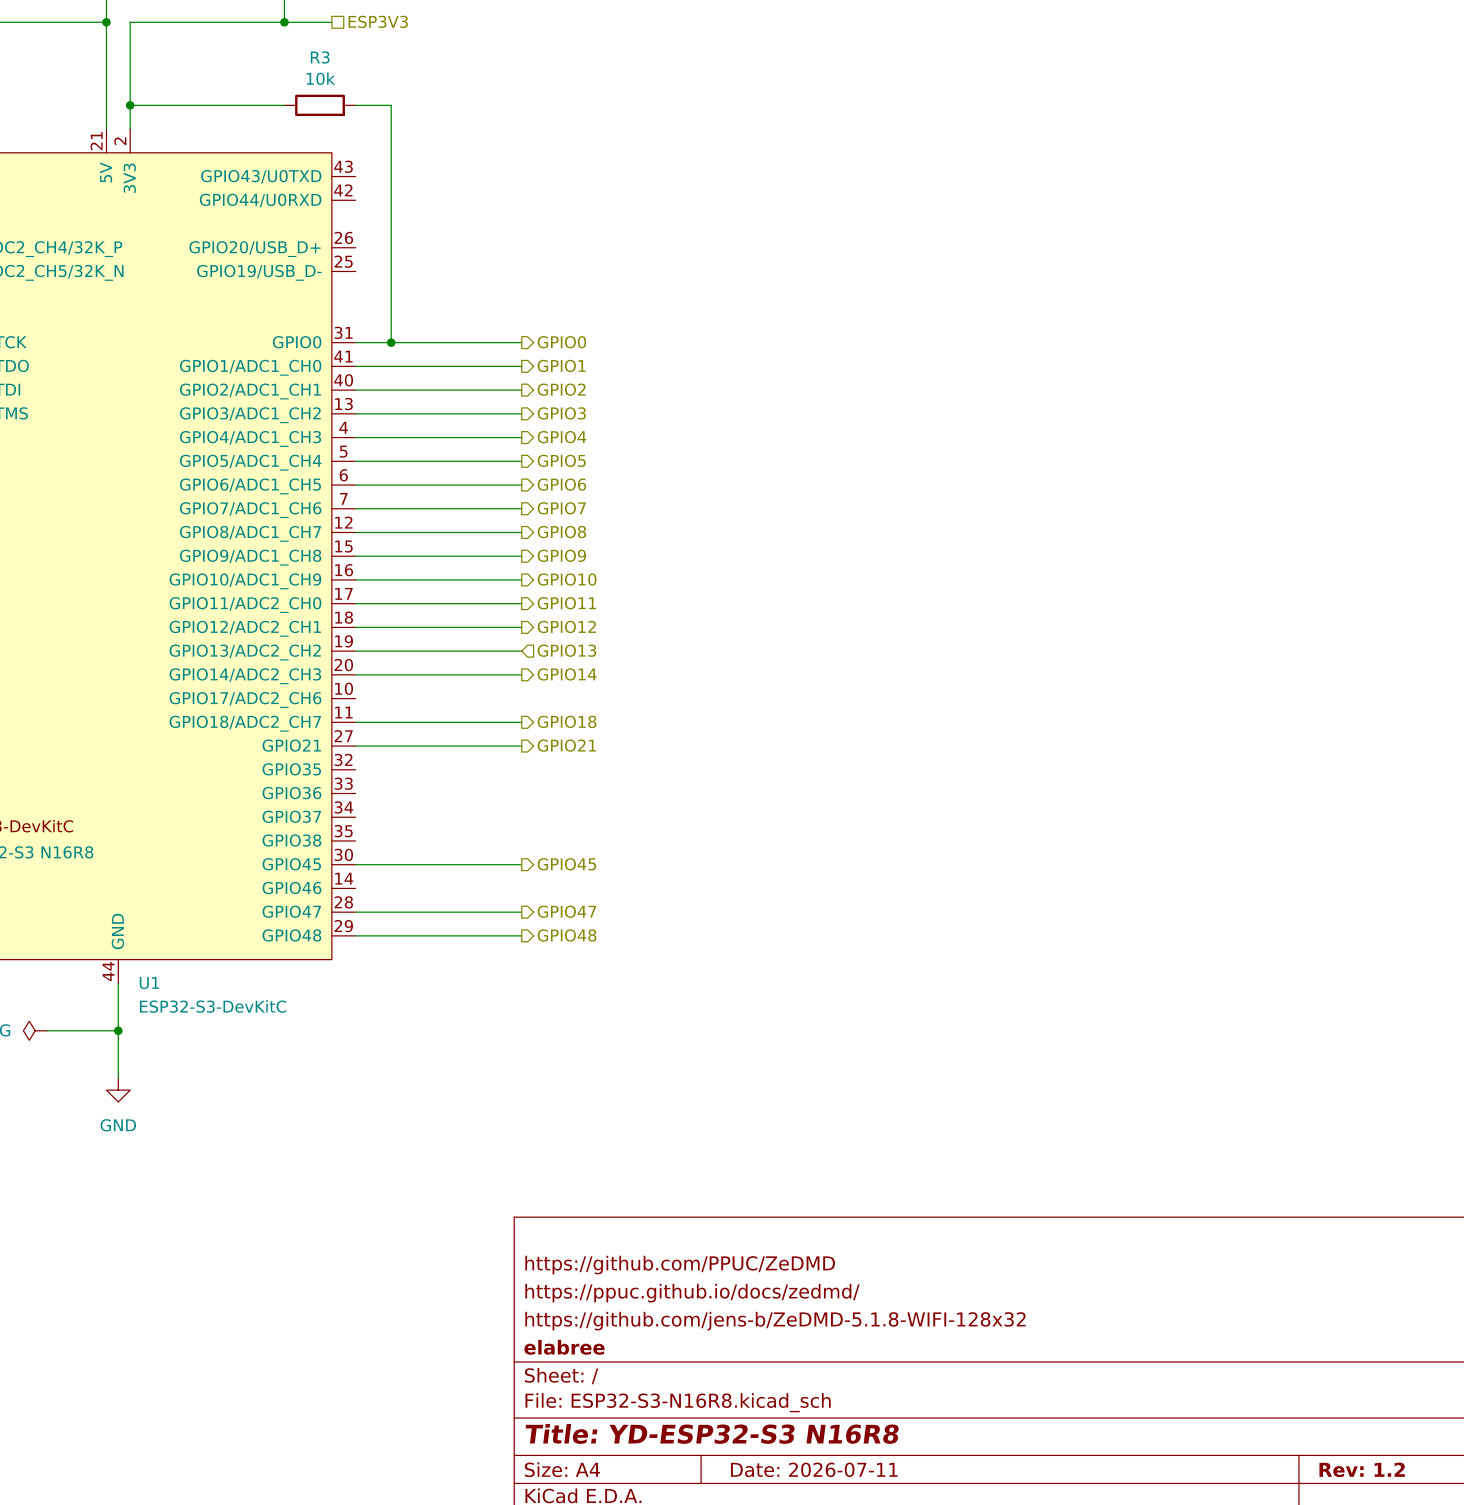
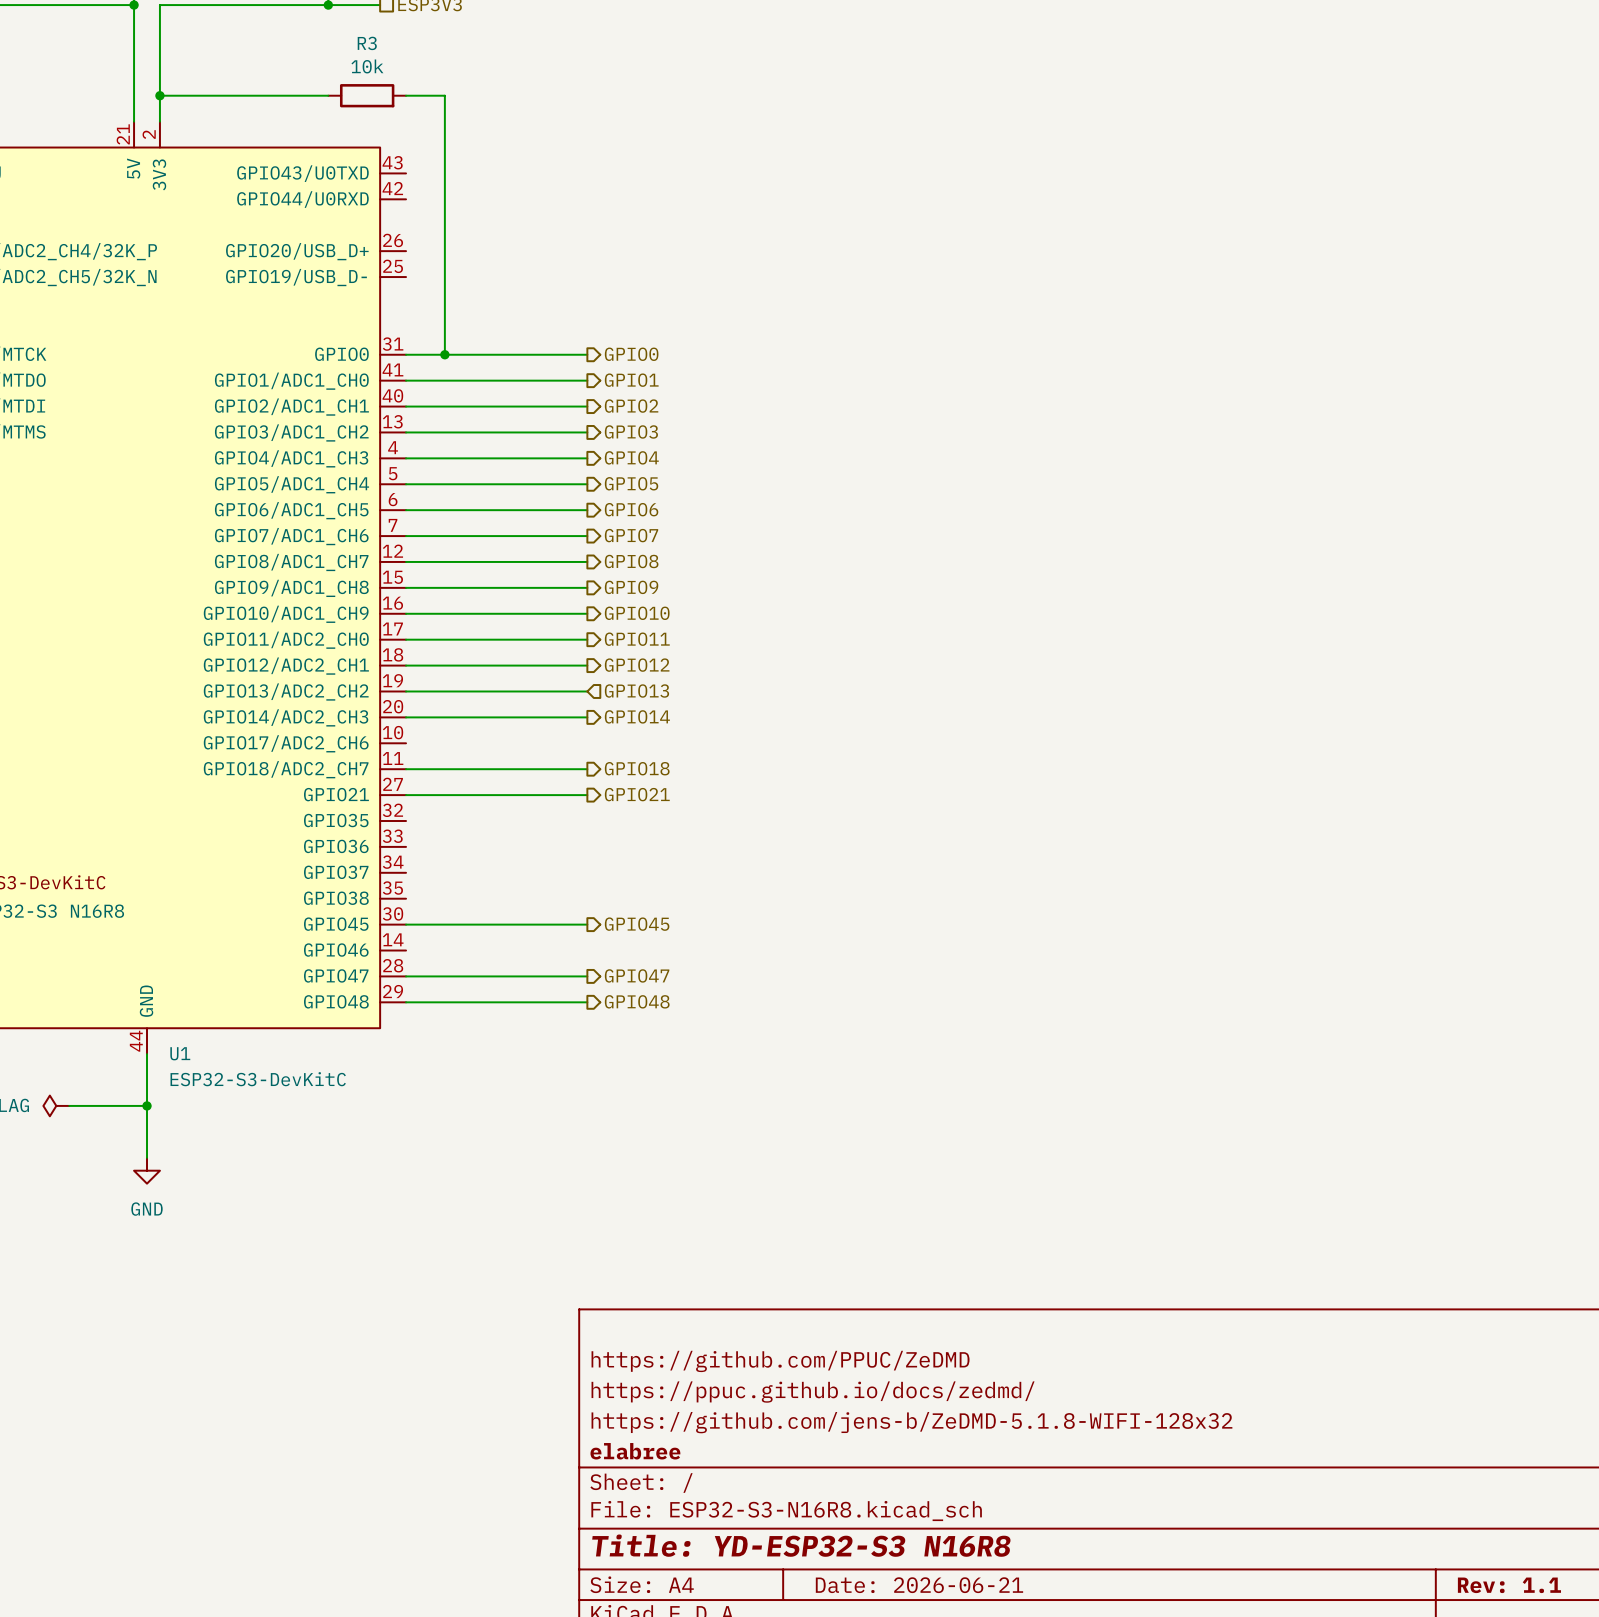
title block: Date: 2026-07-11 (814, 1469) -> Date: 2026-06-21 (919, 1585)
title block: Rev: 1.2 (1362, 1469) -> Rev: 1.1 (1509, 1585)

